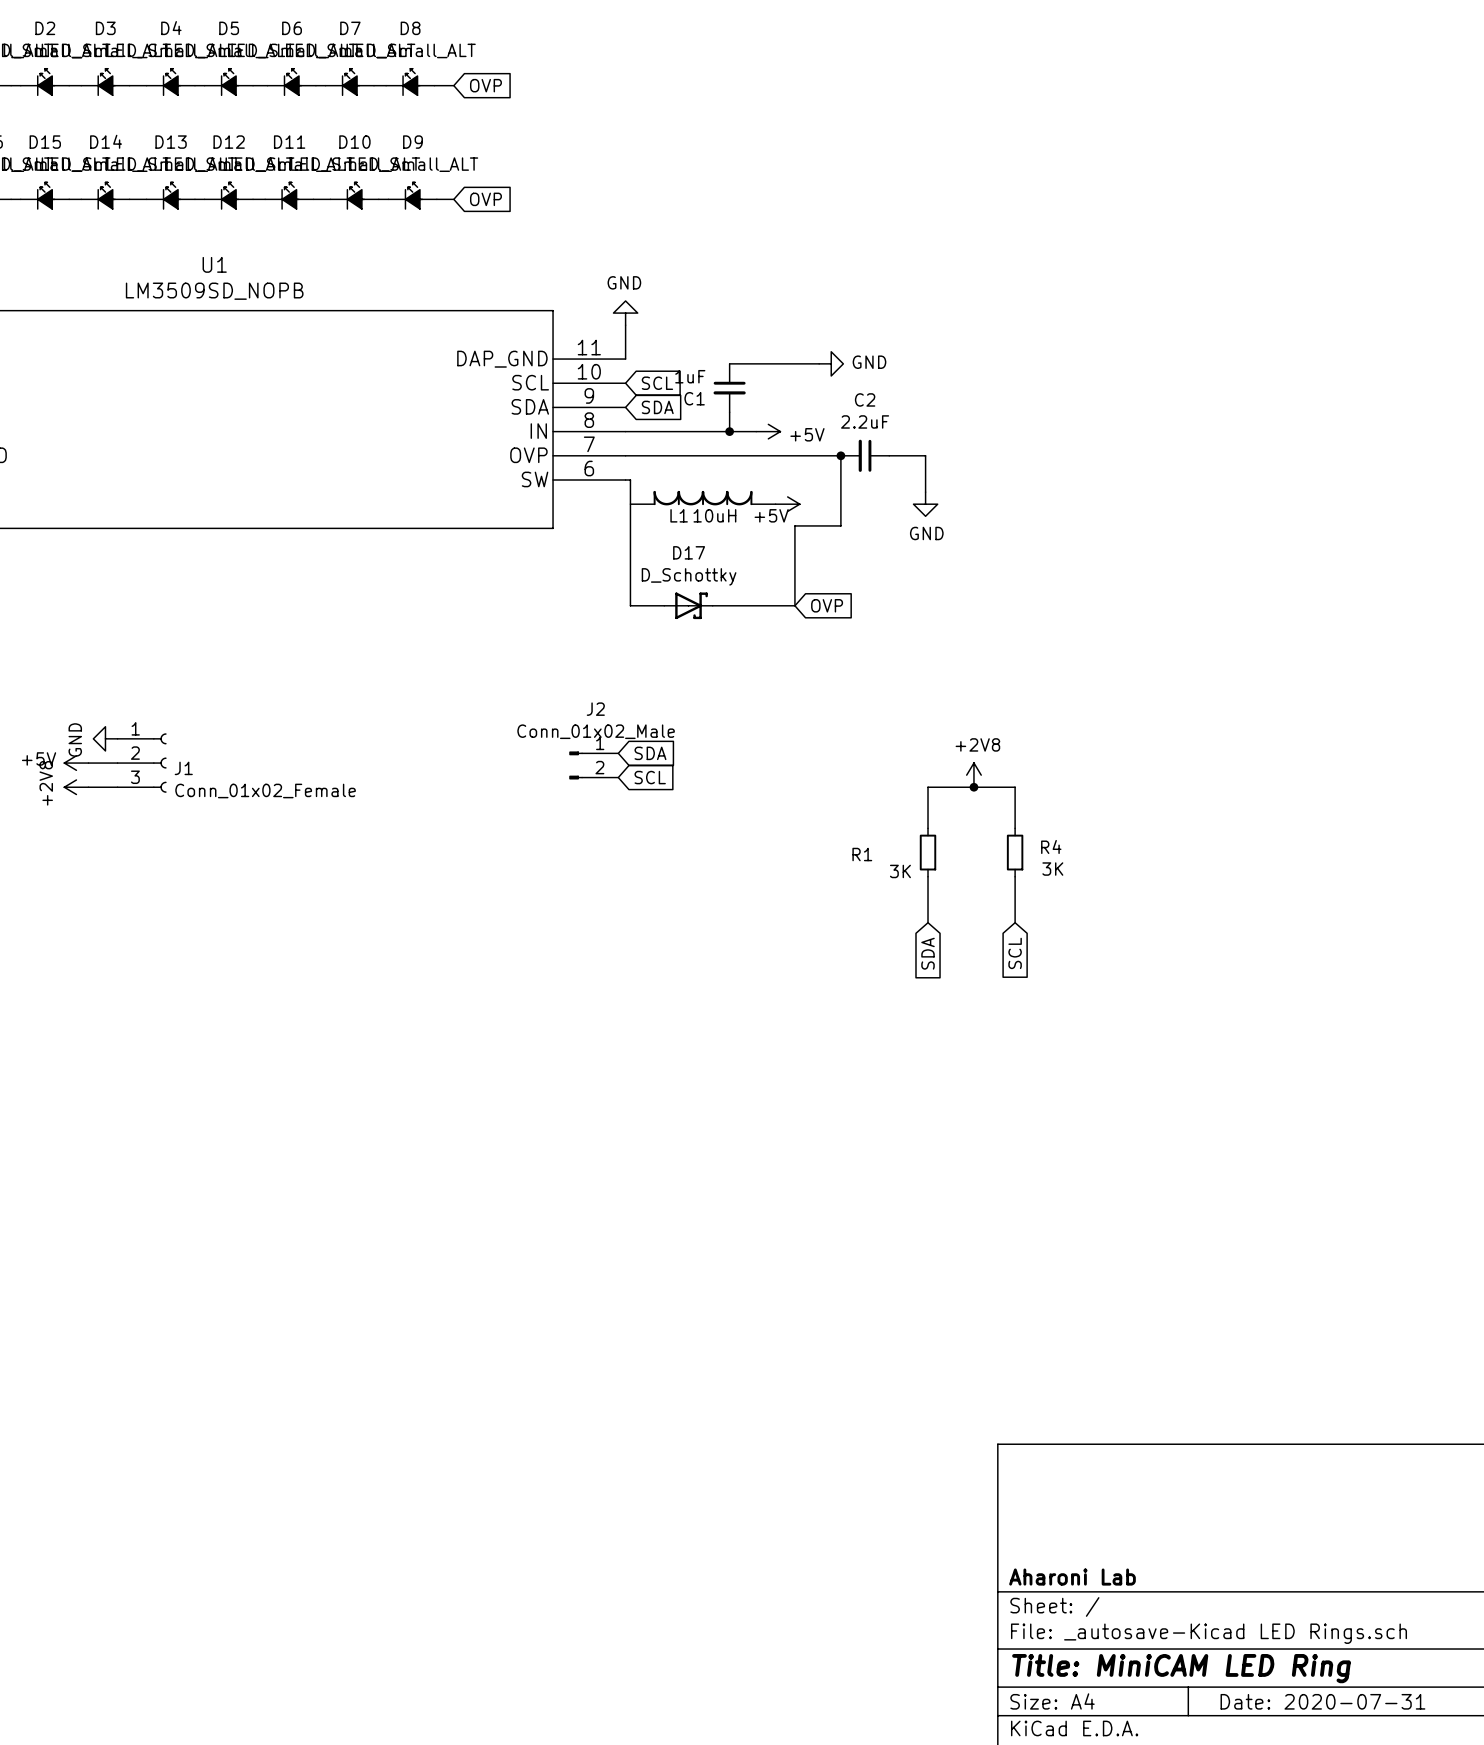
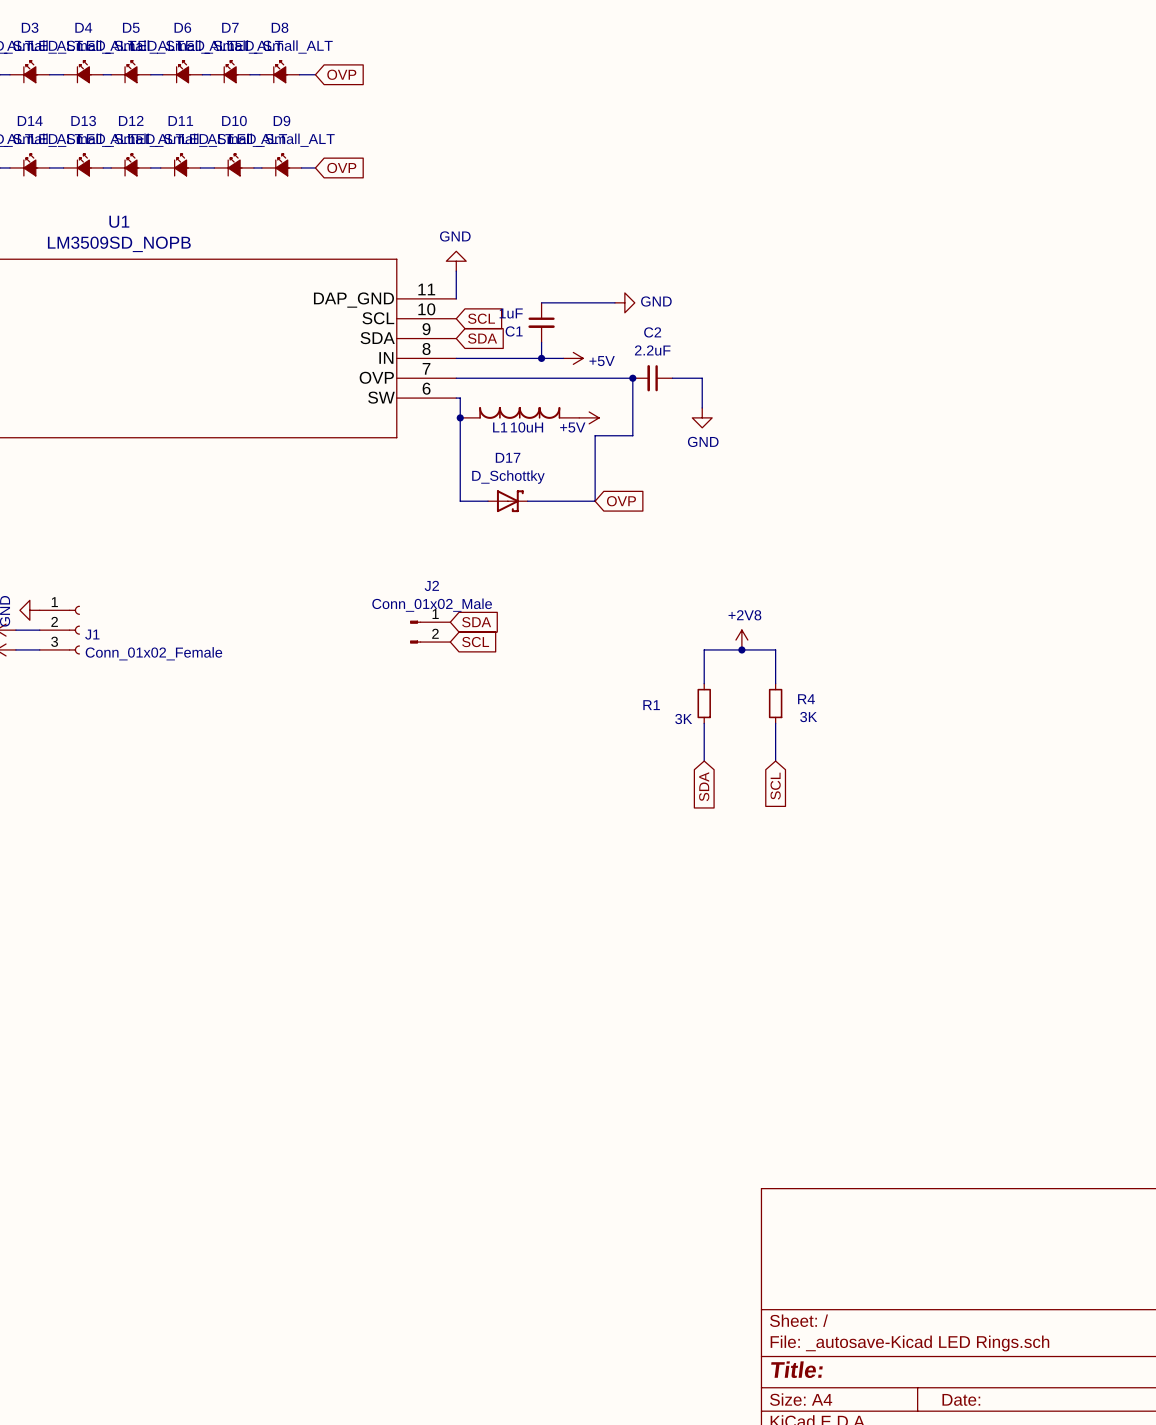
junction: none -> (460, 417)
title block: Aharoni Lab (1072, 1577) -> none
title block: Title: MiniCAM LED Ring (1181, 1668) -> Title: (796, 1369)
title block: Date: 2020-07-31 (1322, 1701) -> Date: (961, 1399)

